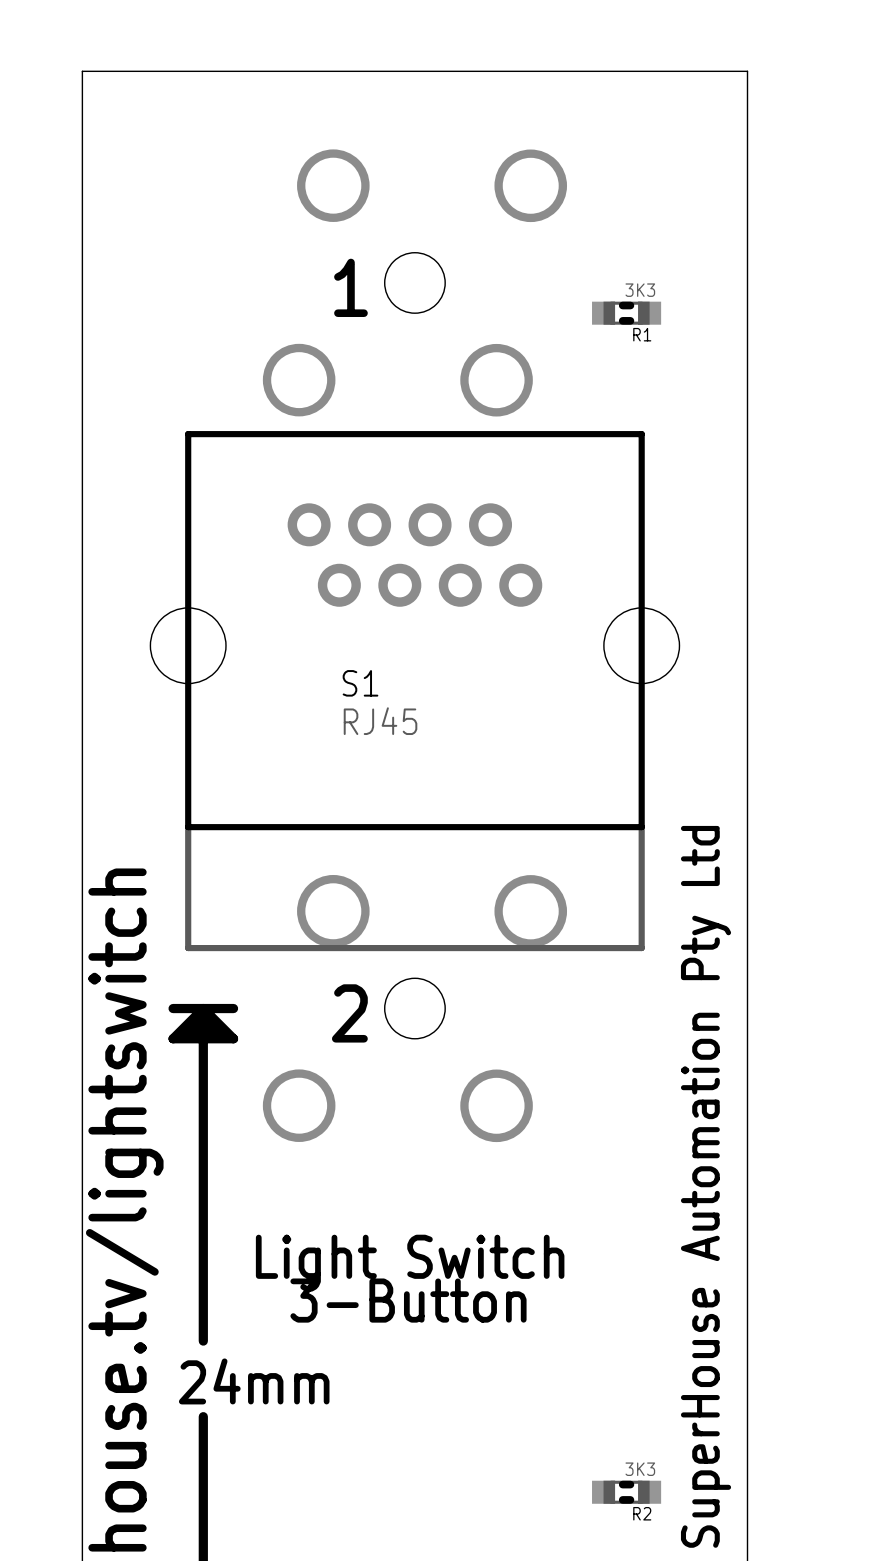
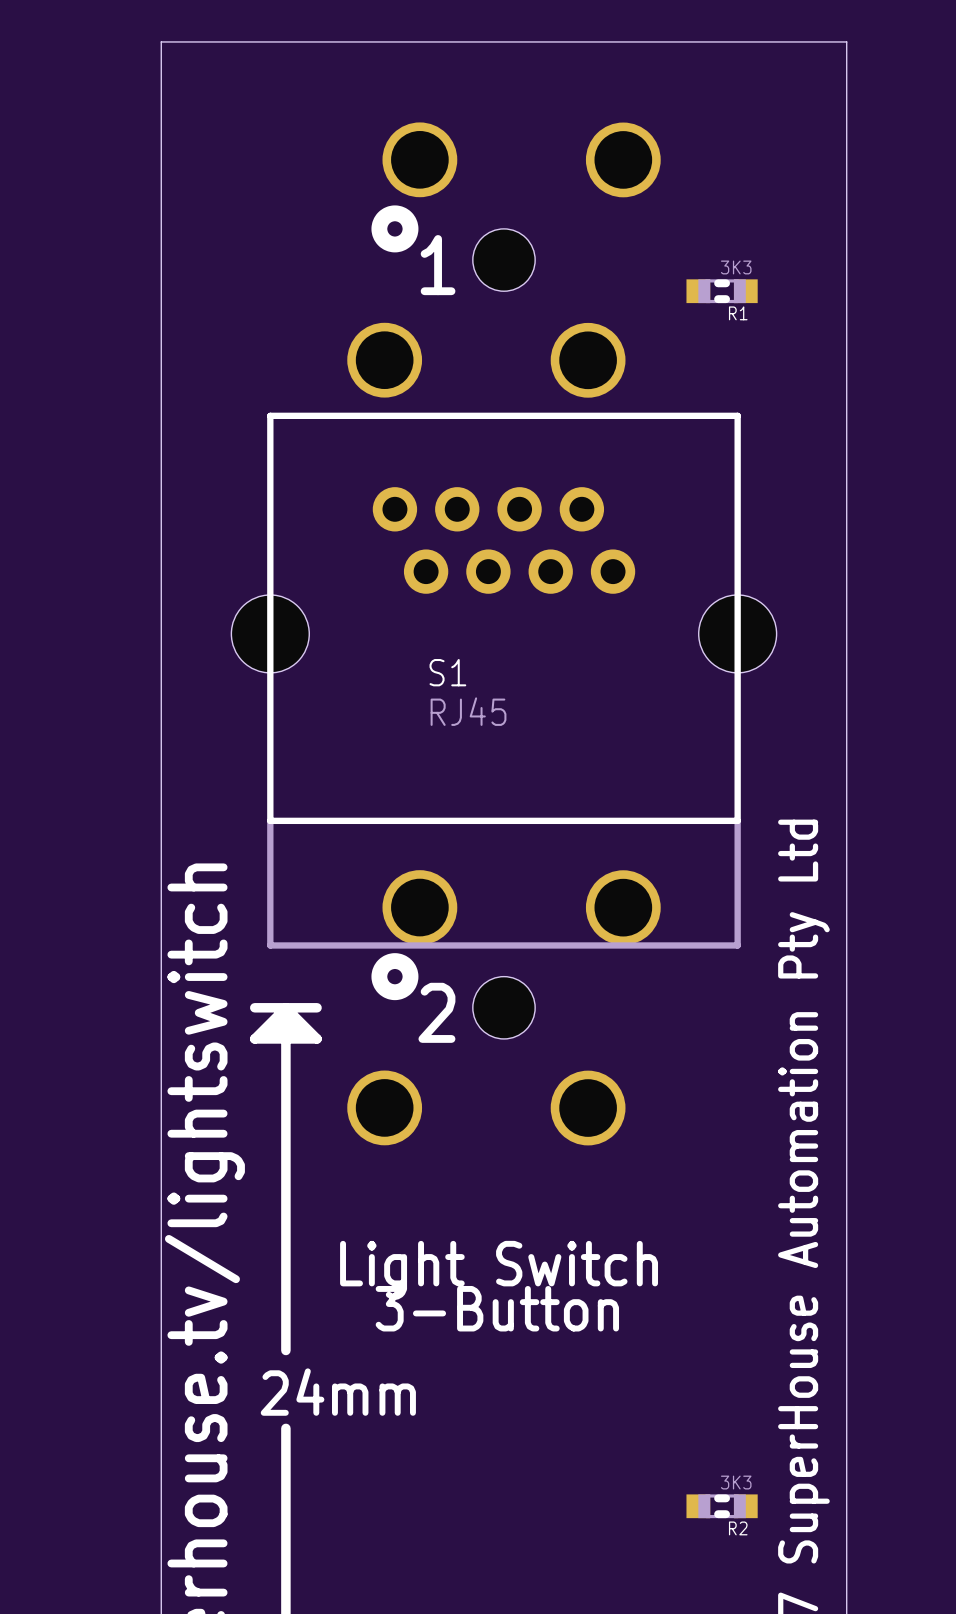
drawing: none -> [371, 205, 419, 253]
drawing: none -> [371, 953, 419, 1001]

